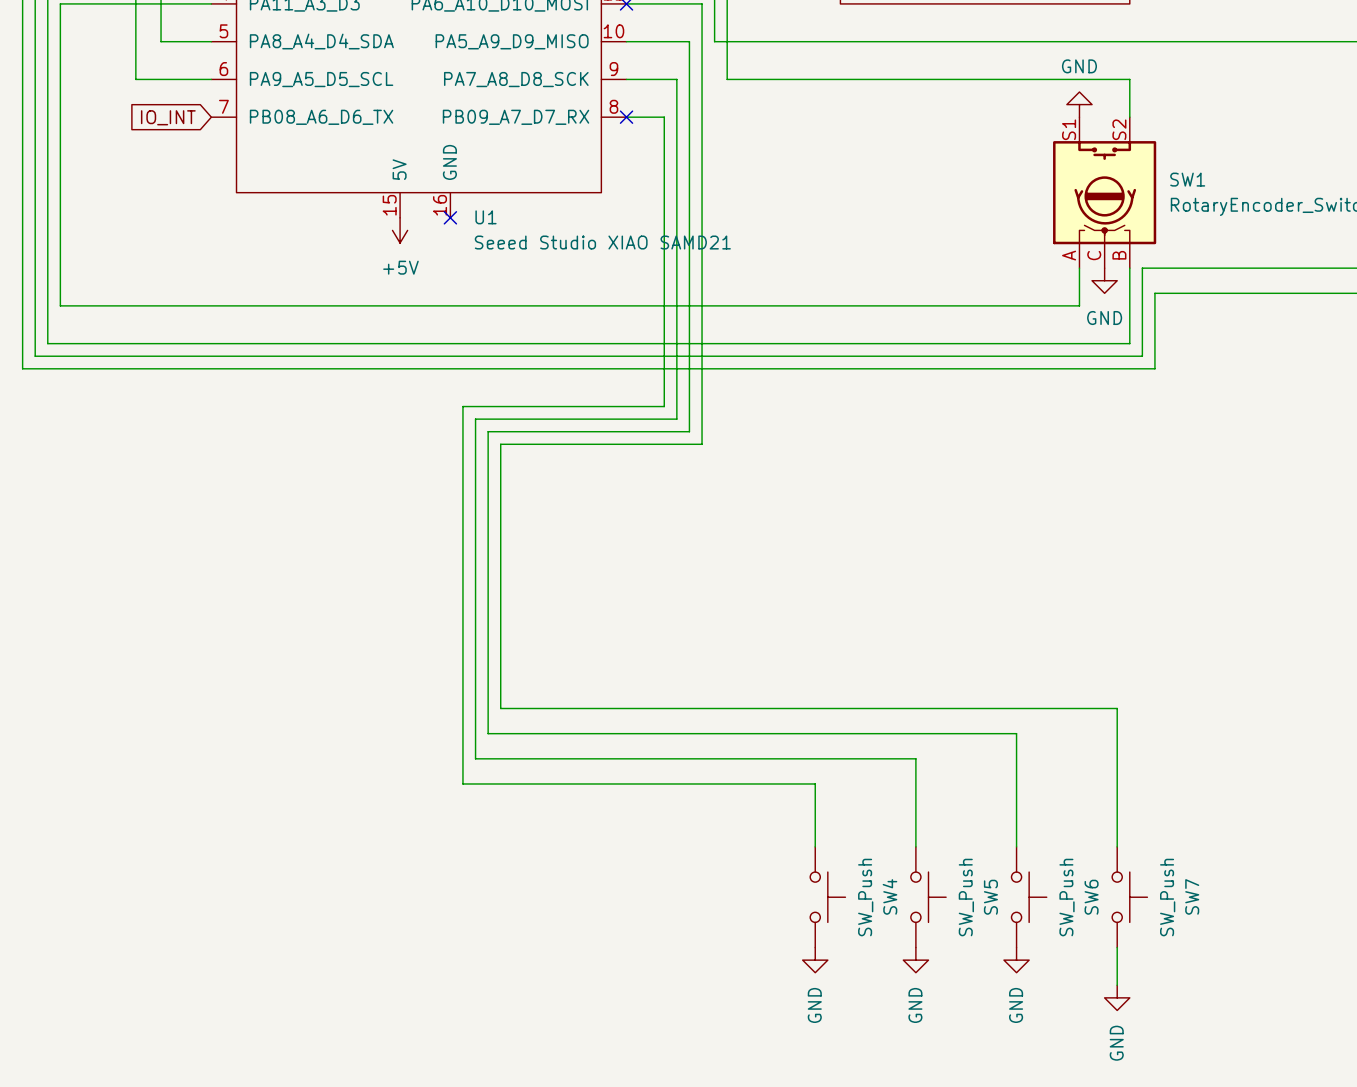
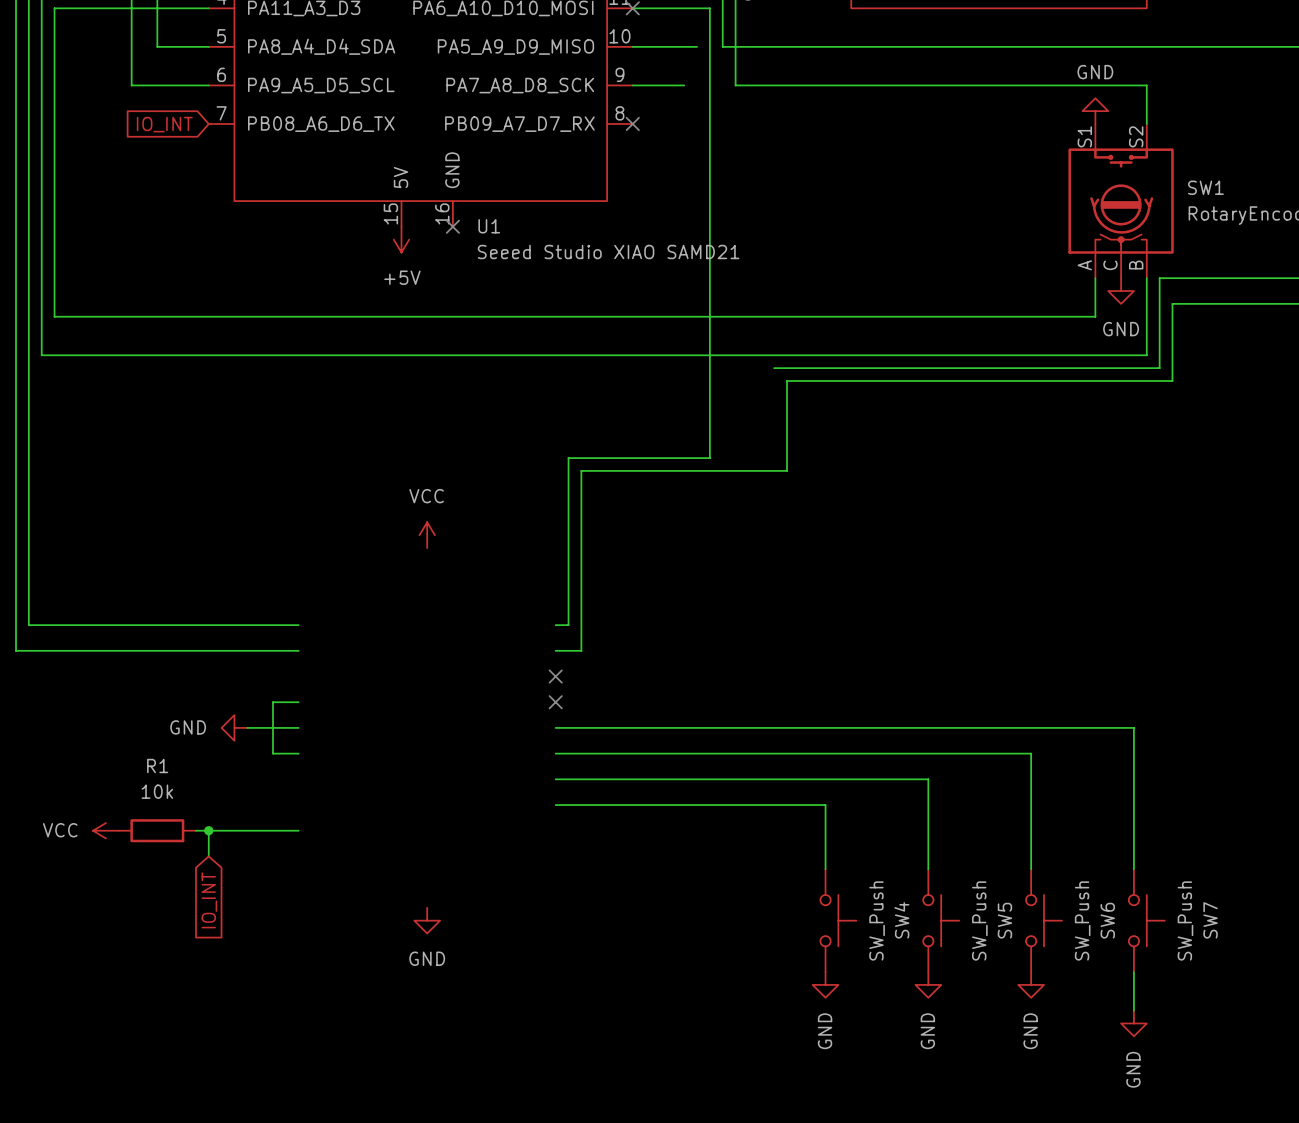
wire: (689, 41) (689, 431) (488, 431) (488, 733) (551, 733) -> none
wire: (676, 79) (676, 419) (475, 419) (475, 758) (551, 758) -> none
wire: (626, 117) (664, 117) (664, 406) (462, 406) (462, 783) (551, 783) -> none
wire: (35, 356) (764, 356) -> (28, 368) (28, 625) (298, 625)
wire: (22, 368) (777, 368) -> (16, 380) (16, 650) (298, 650)
wire: none -> (786, 380) (786, 470) (581, 470) (581, 650) (555, 650)
wire: (563, 444) (500, 444) (500, 708) (551, 708) -> (568, 458) (568, 625) (555, 625)
power symbol: none -> VCC (427, 535)
no-connect mark: none -> (555, 676)
wire: none -> (298, 702) (272, 702) (272, 753) (298, 753)
no-connect mark: none -> (555, 702)
power symbol: none -> GND (234, 727)
wire: none -> (247, 727) (298, 727)
power symbol: none -> VCC (105, 830)
R1: none -> 10k (157, 830)
wire: none -> (195, 830) (298, 830)
wire: none -> (208, 830) (208, 856)
junction: none -> (208, 830)
global label: none -> IO_INT (209, 900)
power symbol: none -> GND (427, 920)

